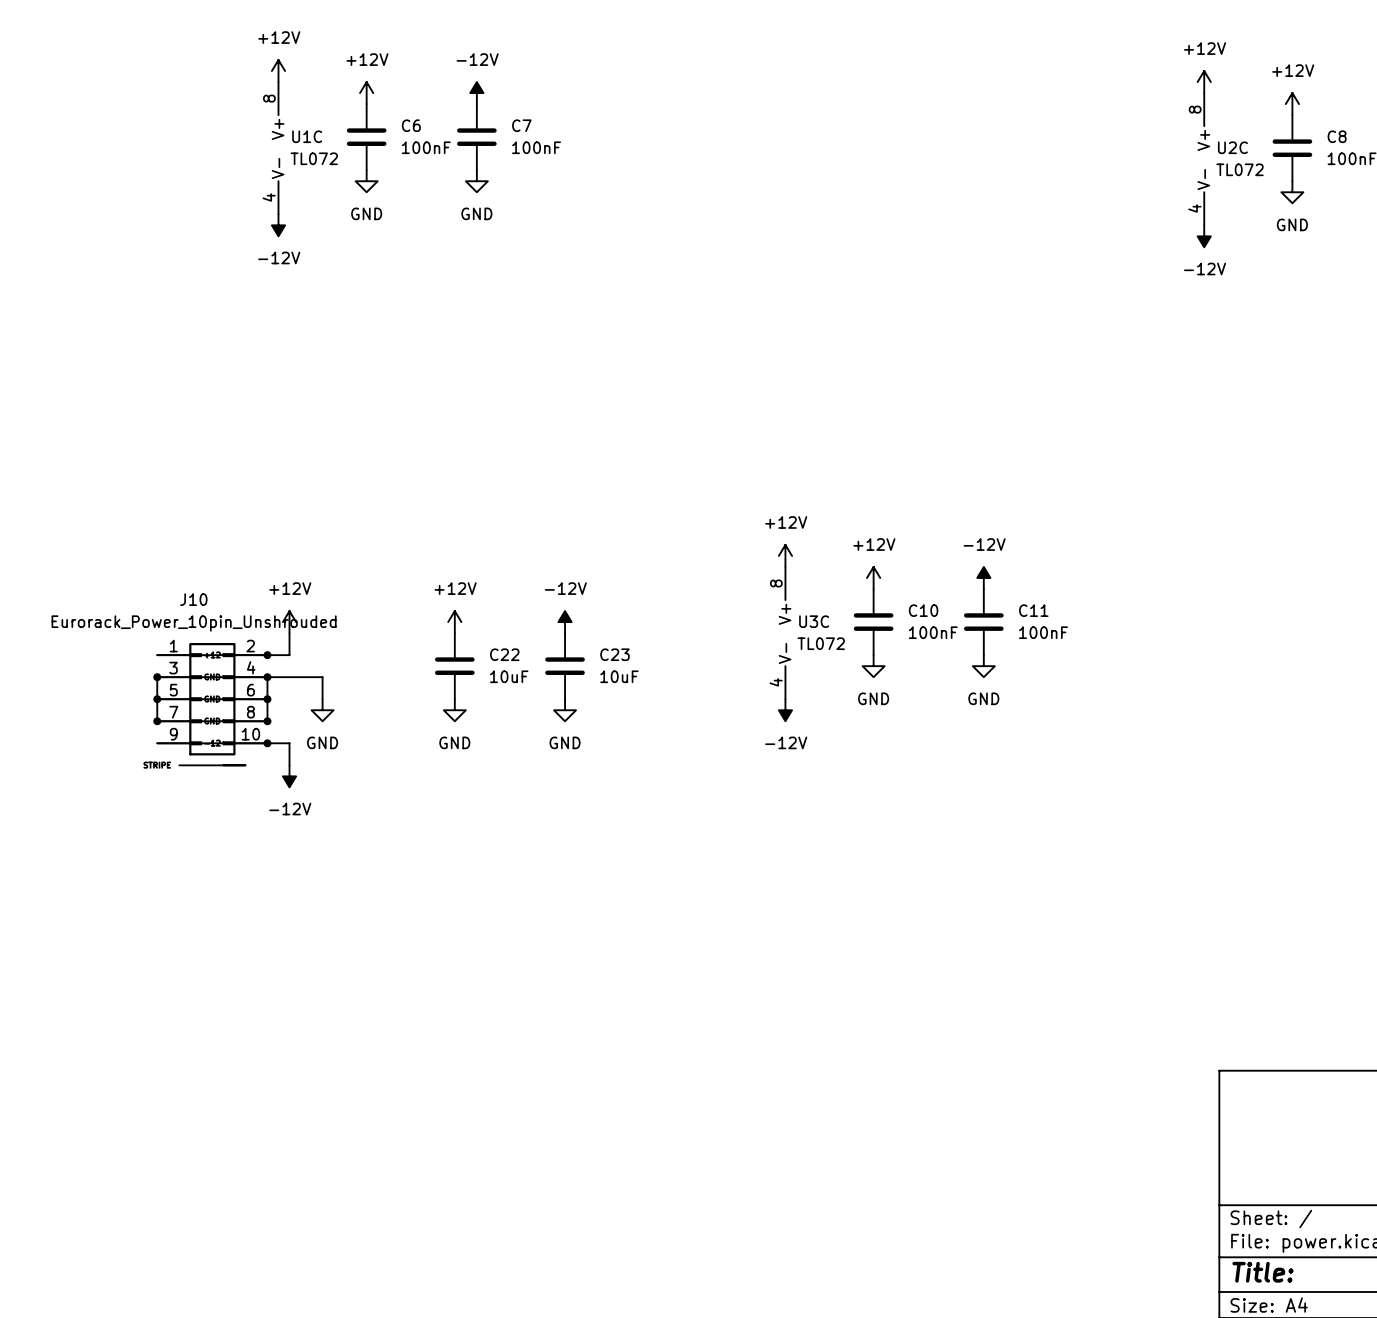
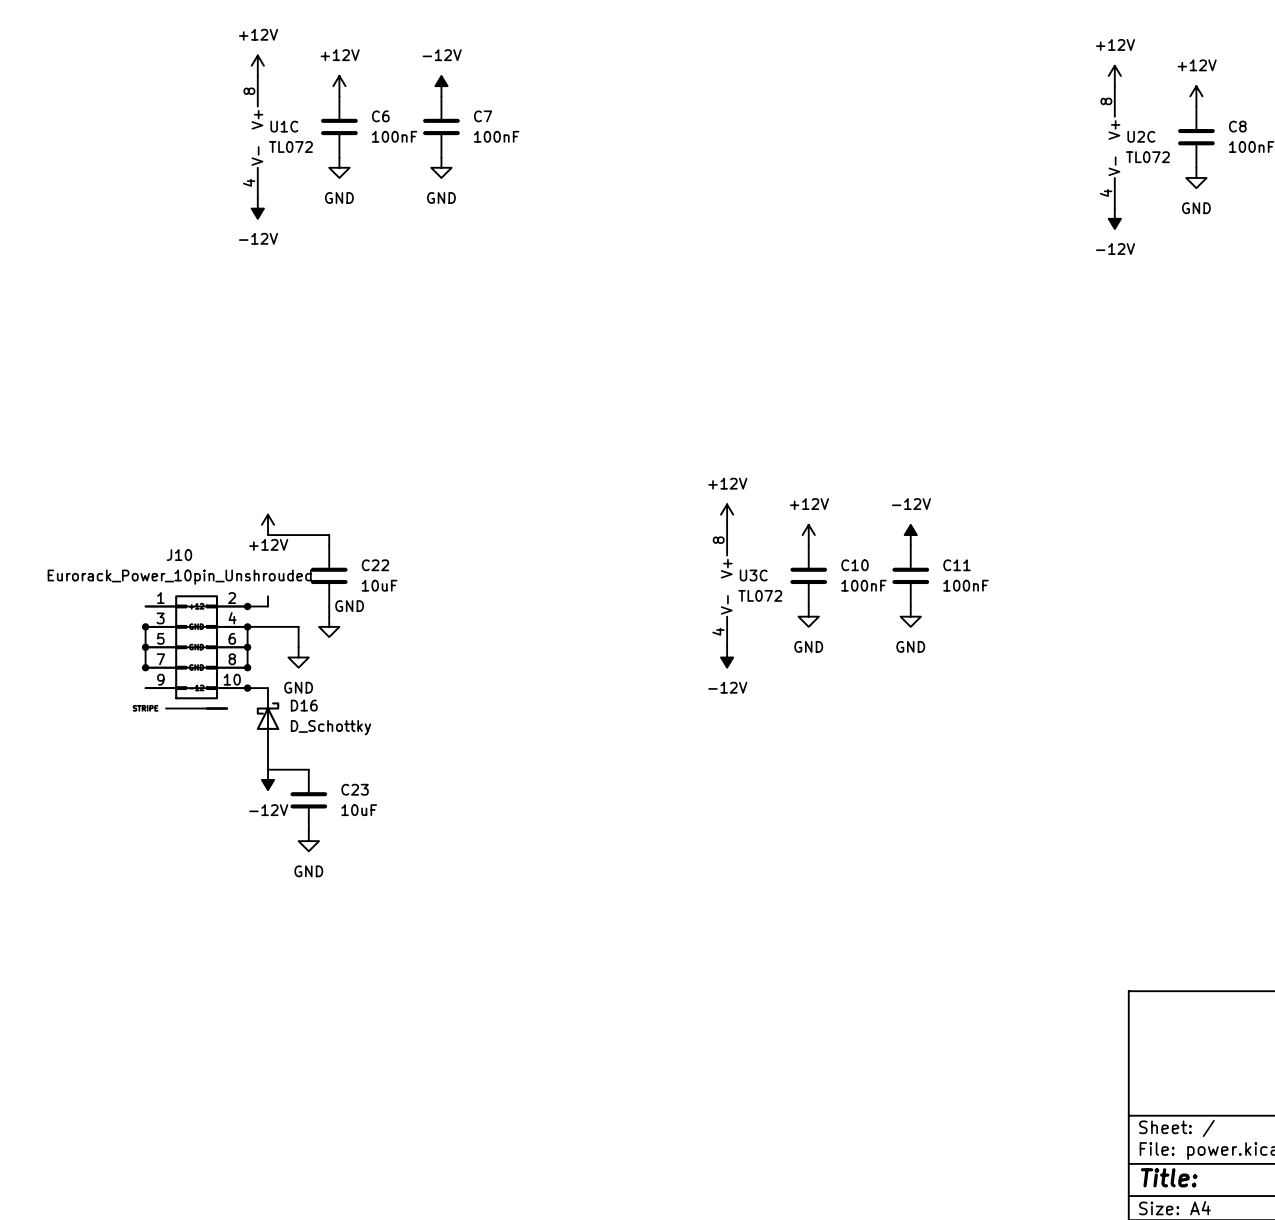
wire: none -> (268, 535) (329, 535) (329, 545)
power symbol position: +12V (289, 622) -> +12V (268, 524)
power symbol: +12V (454, 622) -> none
power symbol: -12V (565, 622) -> none
wire: (289, 633) (289, 644) -> (329, 606) (329, 616)
C22 position: (454, 666) -> (329, 575)
C23 position: (565, 666) -> (308, 800)
power symbol position: GND (454, 710) -> GND (329, 626)
power symbol: GND (565, 710) -> none
power symbol text position: GND (454, 742) -> GND (349, 606)
power symbol position: -12V (289, 776) -> -12V (268, 779)
D16: none -> D_Schottky (268, 718)
wire: none -> (268, 749) (268, 769) (308, 769)
power symbol: none -> GND (308, 841)

